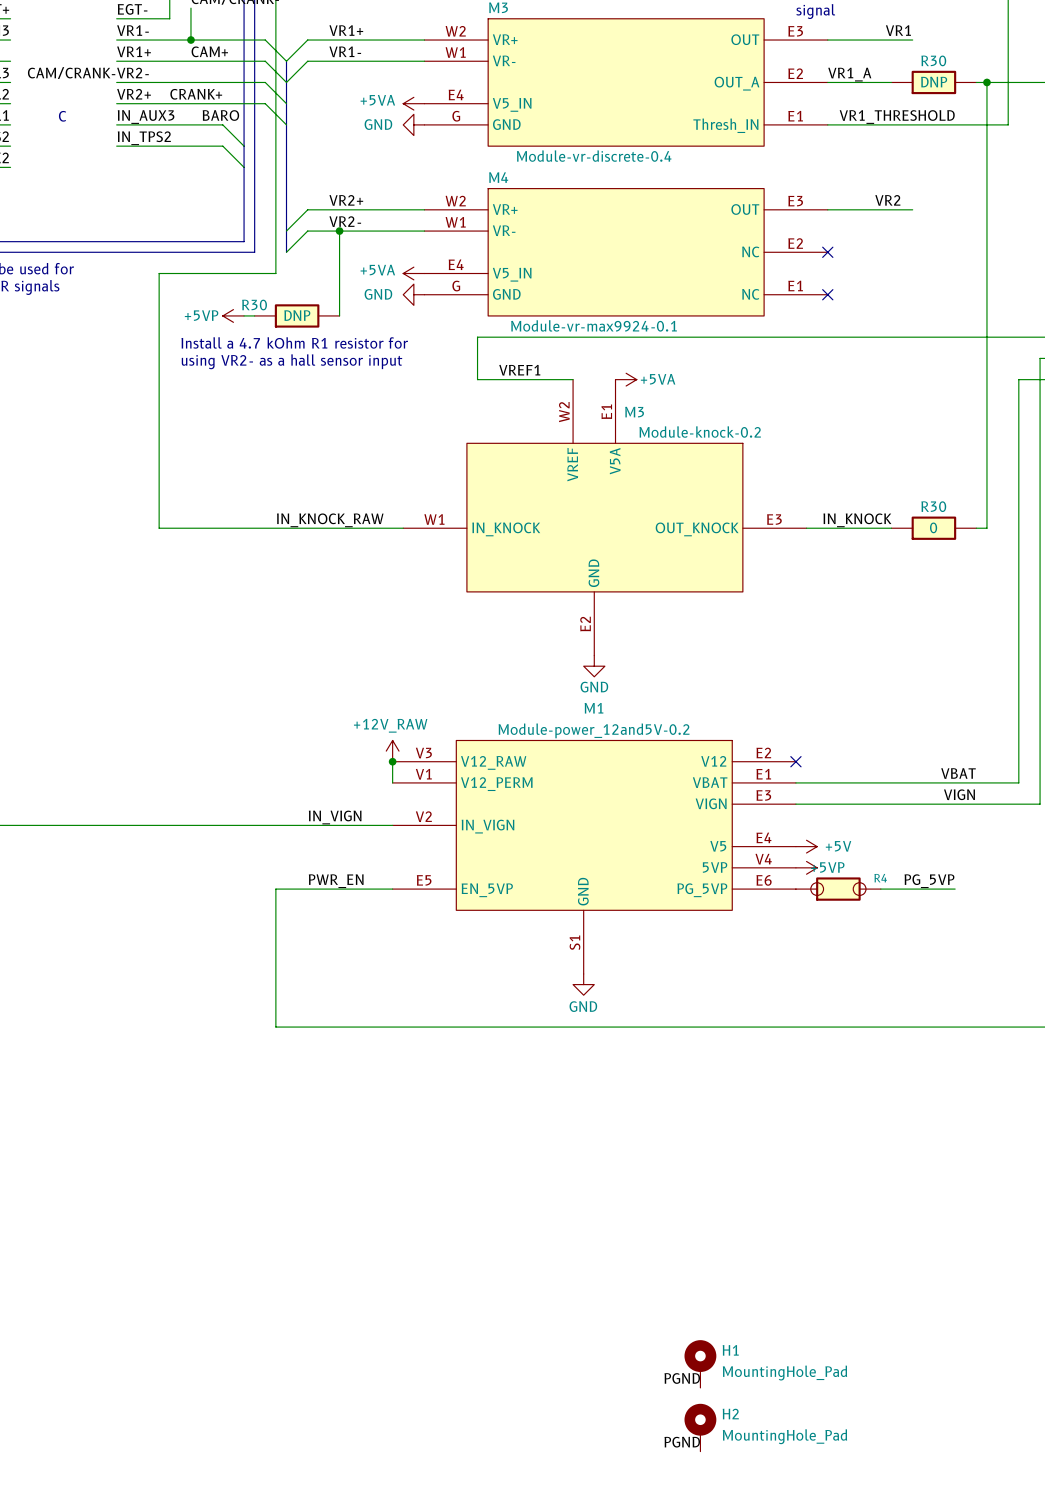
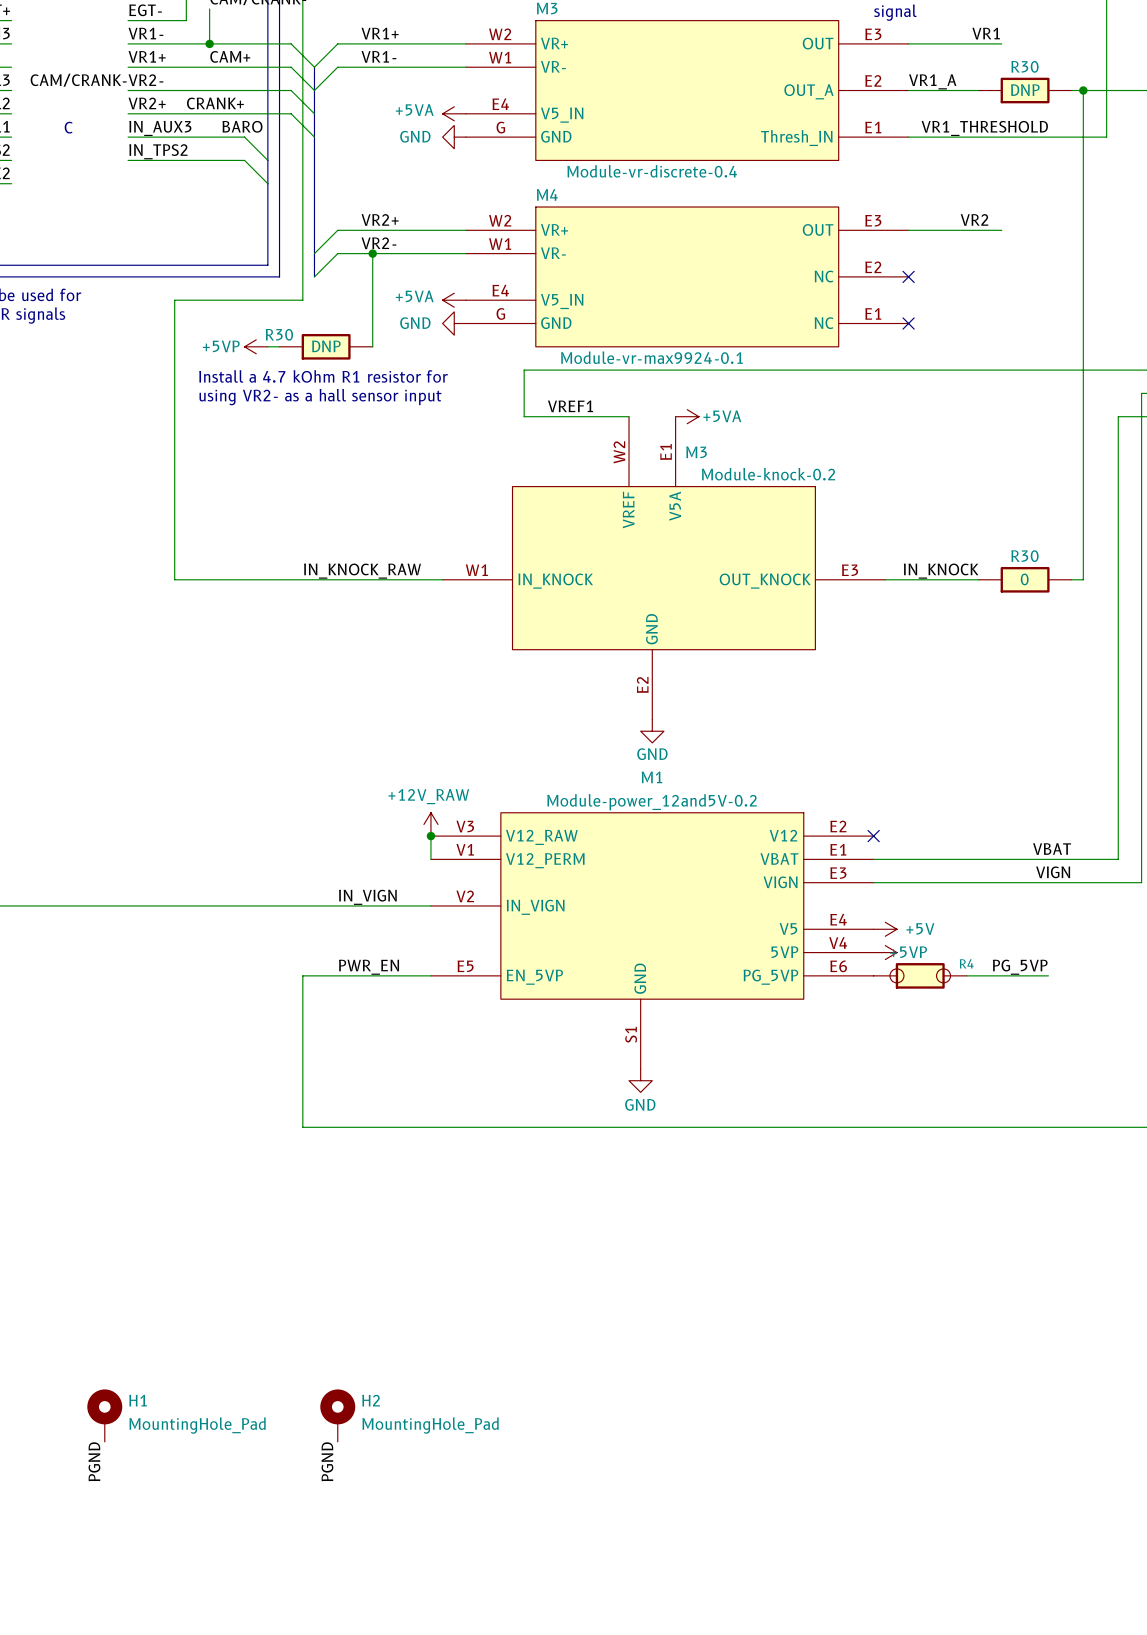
label: none -> PGND (94, 1461)
label: none -> PGND (327, 1461)
H1 position: (700, 1364) -> (104, 1415)
label: PGND (682, 1378) -> none
H2 position: (700, 1427) -> (337, 1415)
label: PGND (682, 1442) -> none

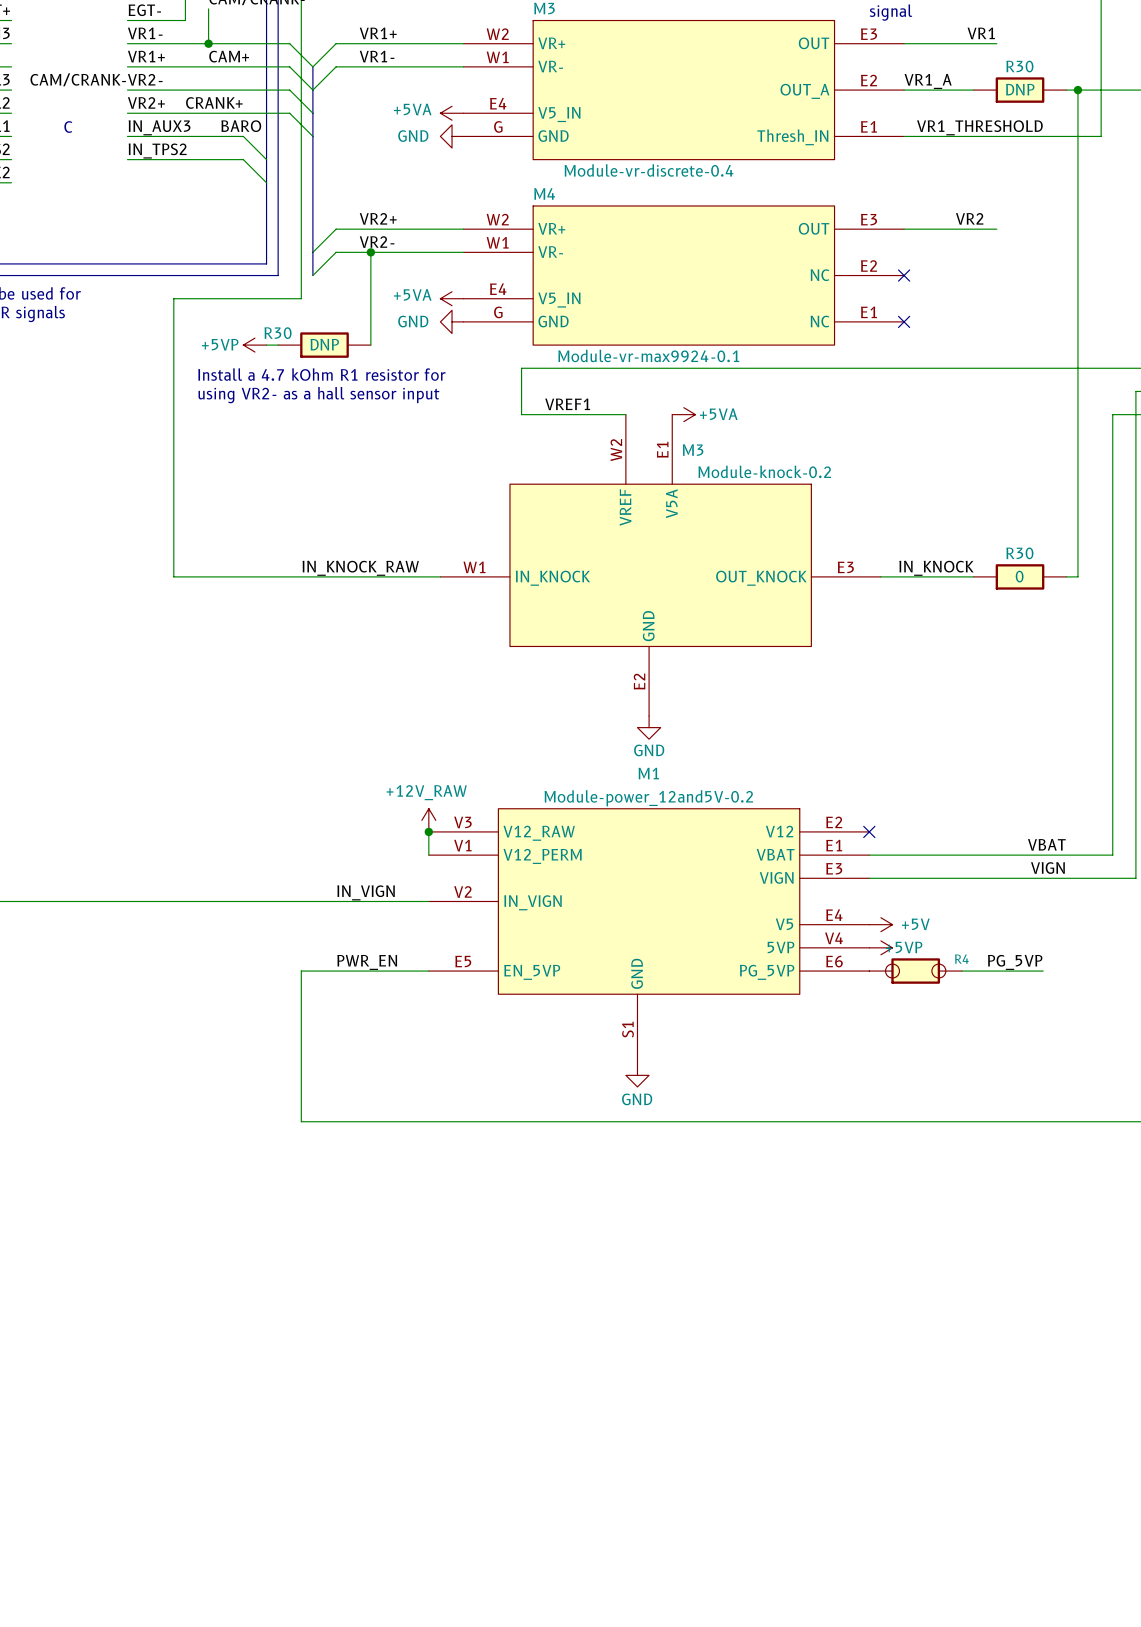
H1: MountingHole_Pad (104, 1415) -> none
H2: MountingHole_Pad (337, 1415) -> none
label: PGND (94, 1461) -> none
label: PGND (327, 1461) -> none

